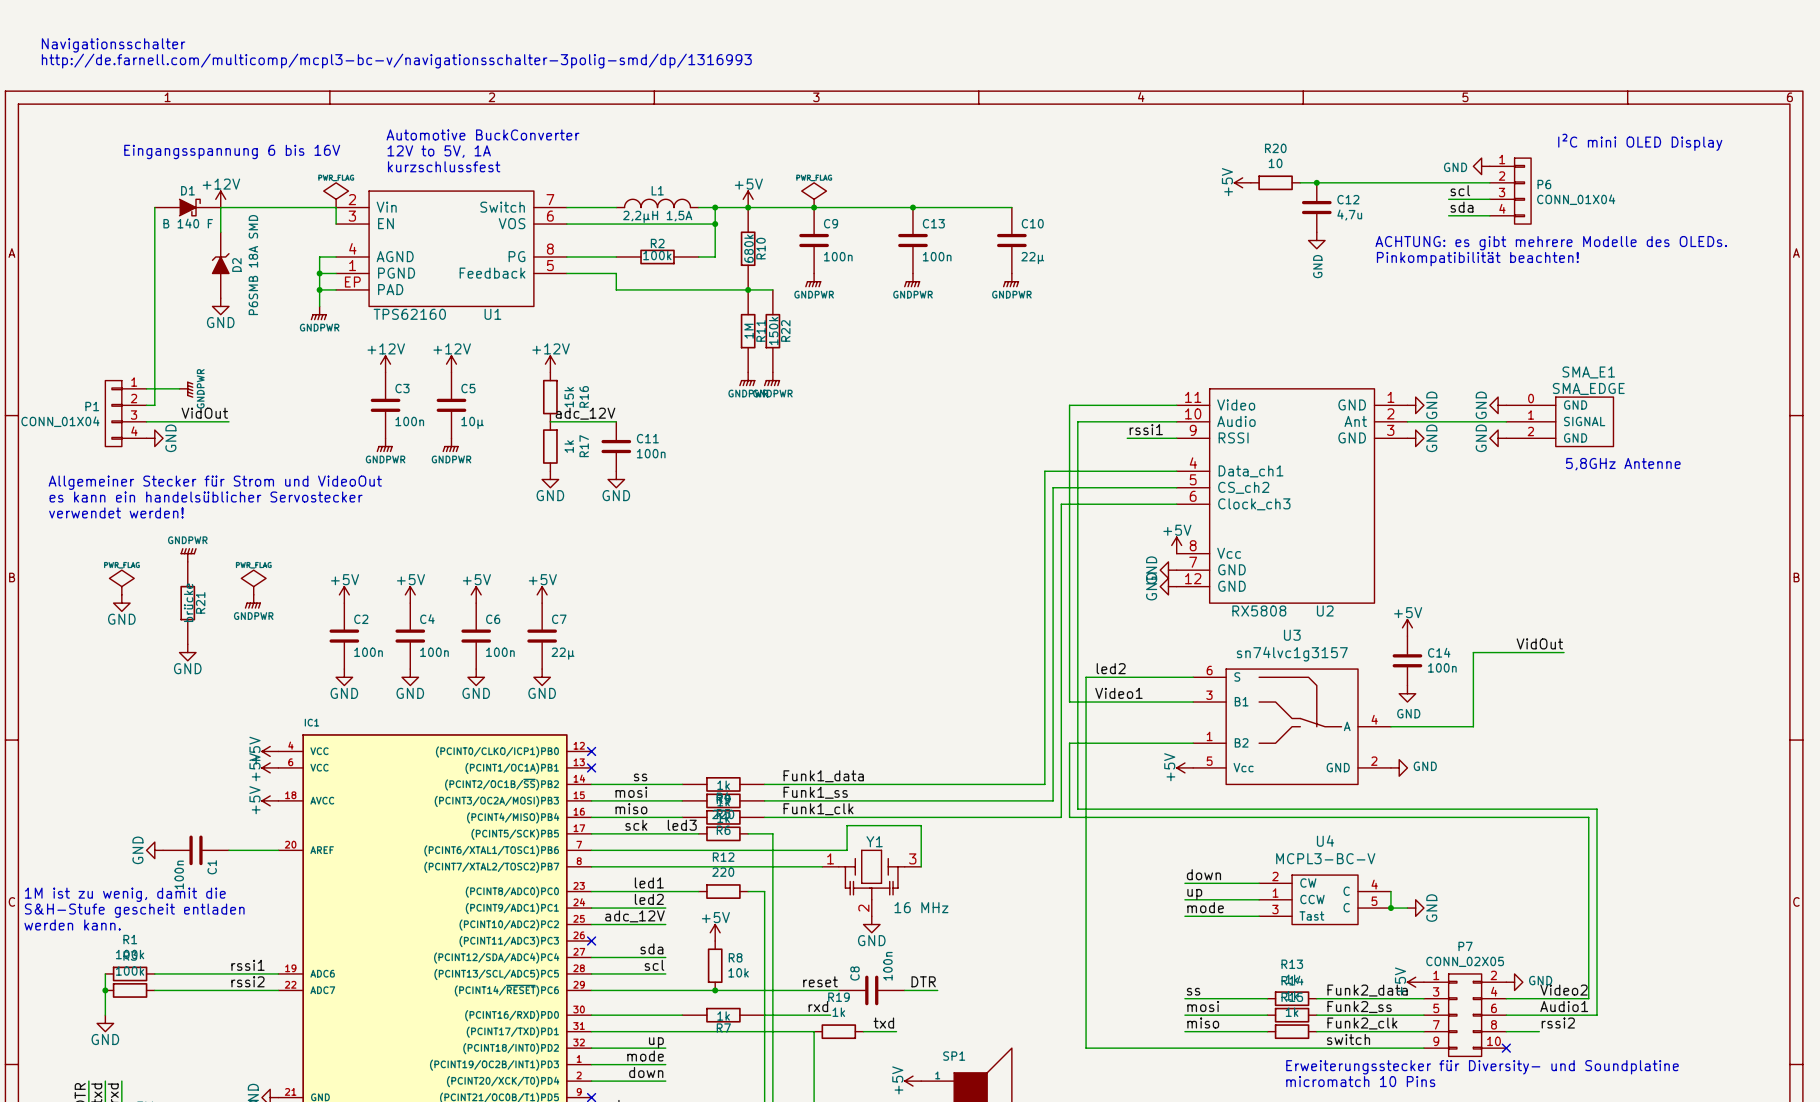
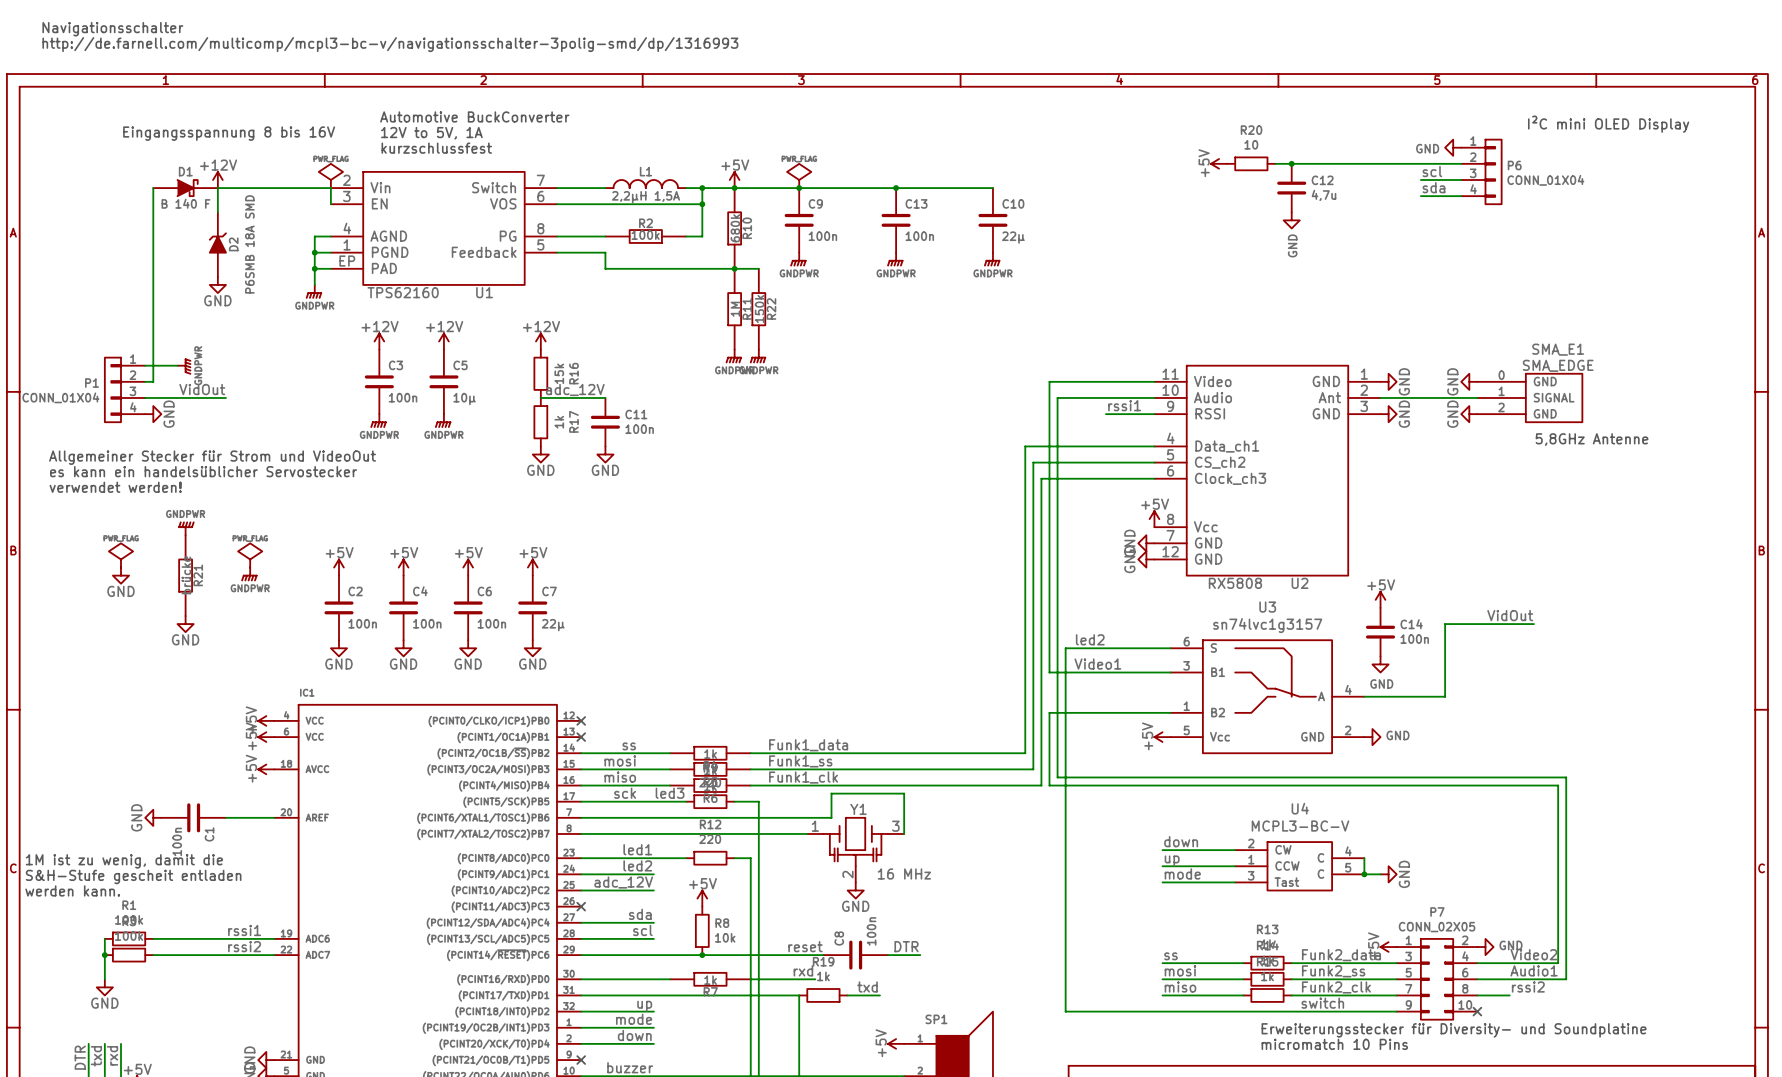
text: Eingangsspannung 6 bis 16V (232, 151) -> Eingangsspannung 8 bis 16V (229, 133)
text: ACHTUNG: es gibt mehrere Modelle des OLEDs. (1551, 243) -> none
text: Pinkompatibilität beachten! (1477, 259) -> none

